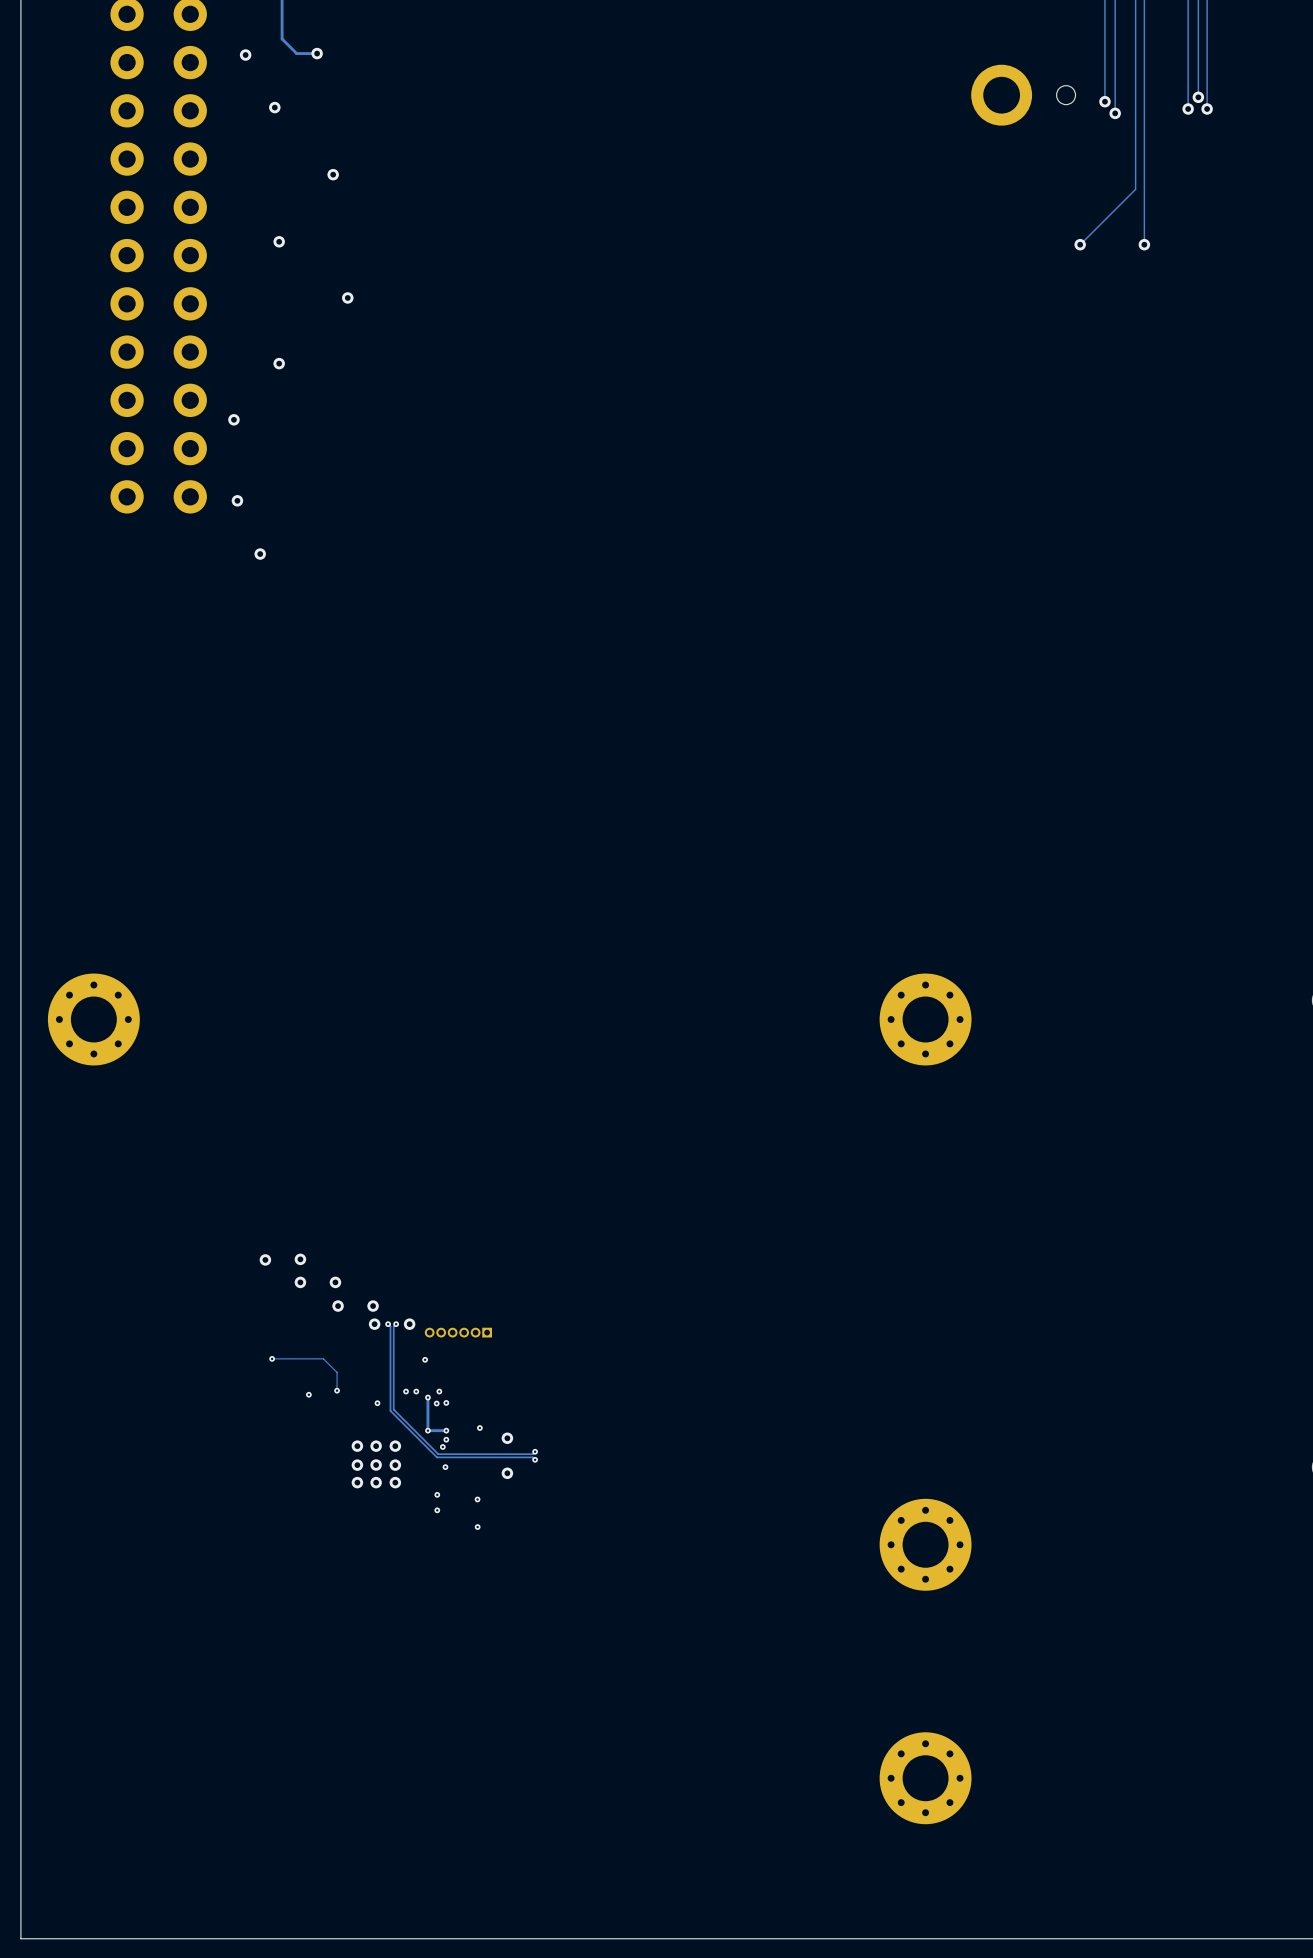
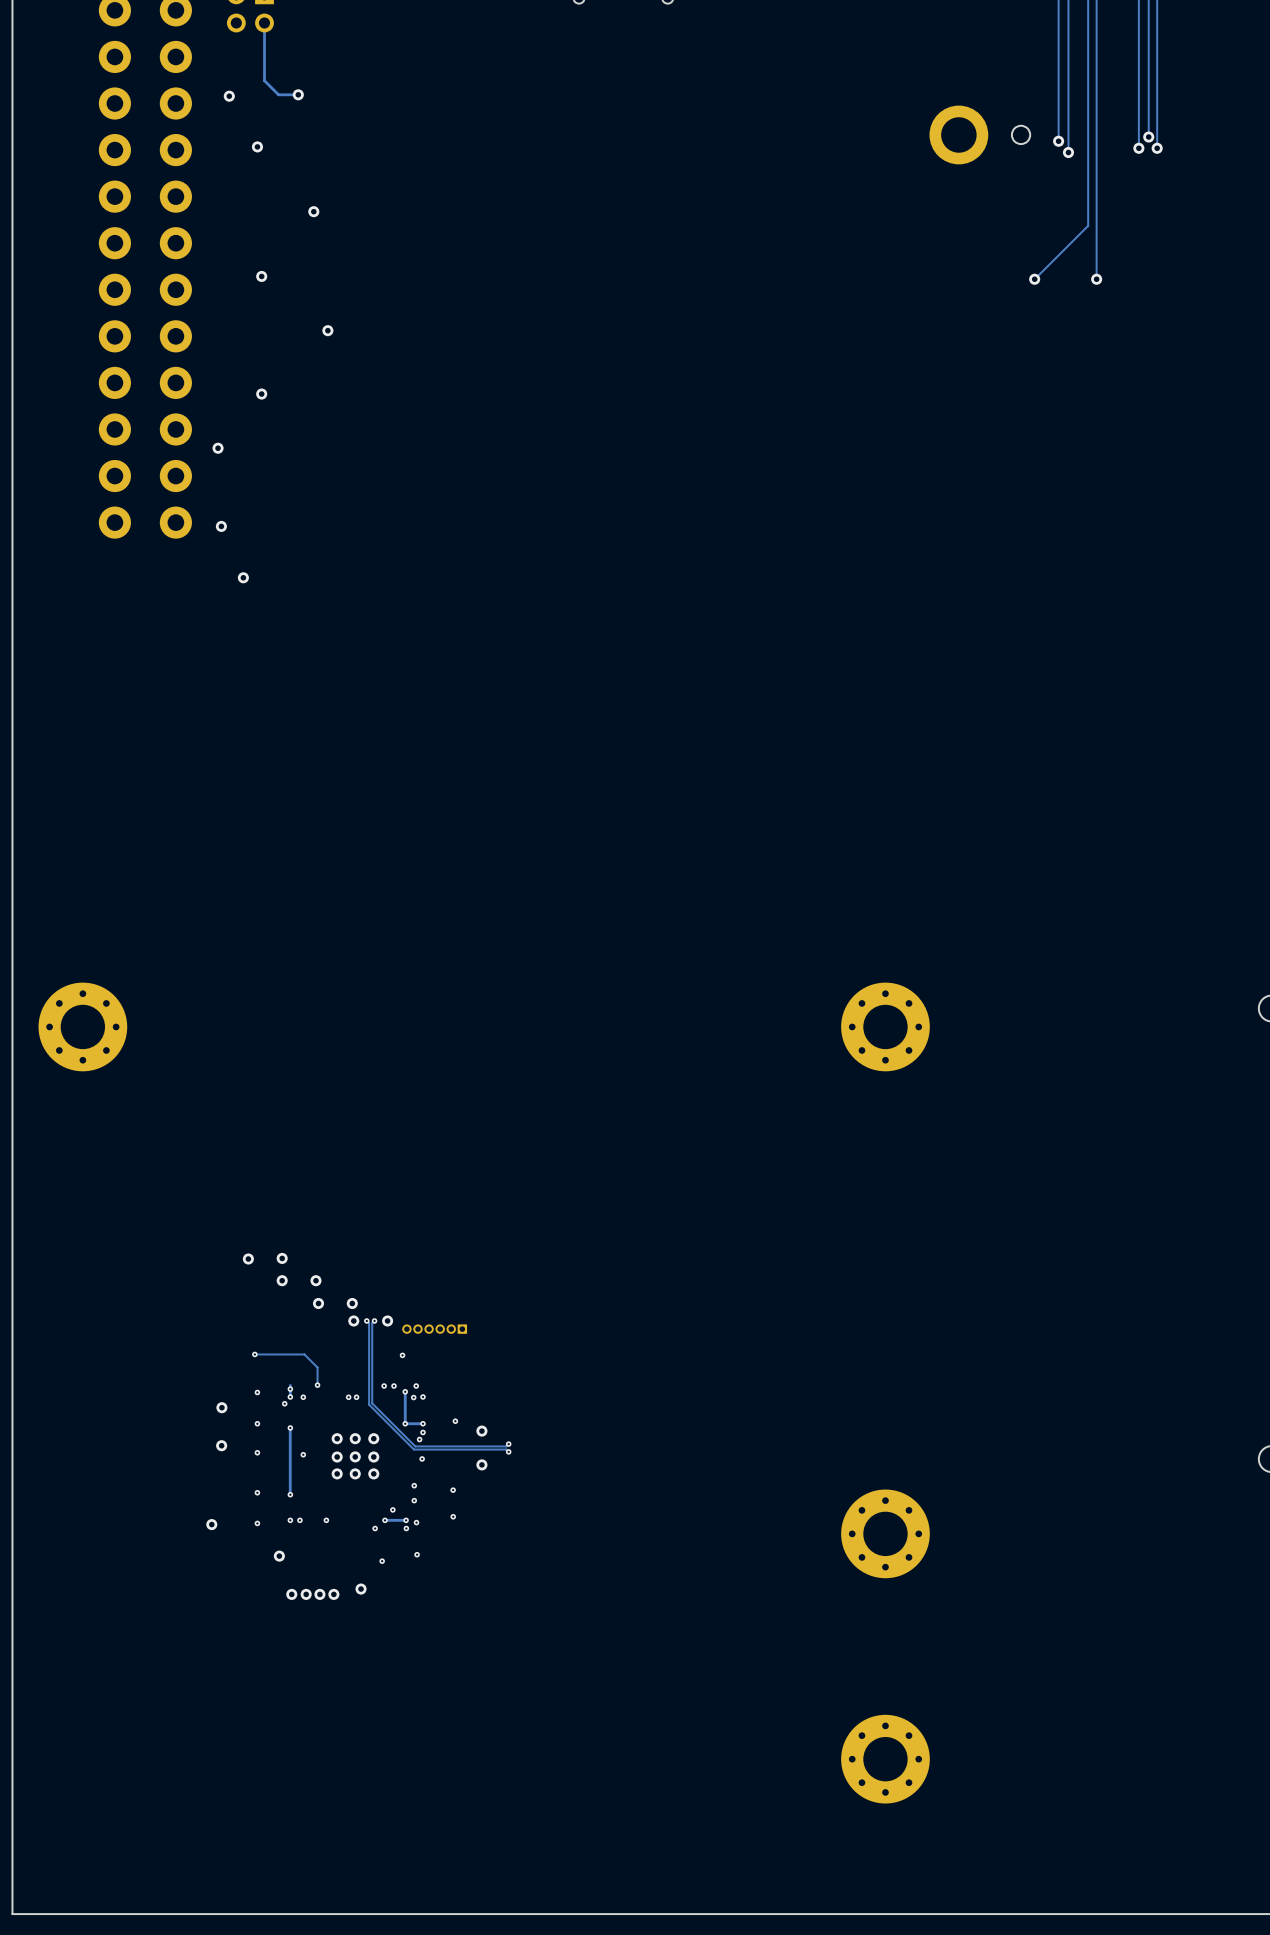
track: none -> (290, 1385) (290, 1396)
via: none -> (257, 1392)
via: none -> (290, 1396)
via: none -> (303, 1397)
via: none -> (348, 1397)
via: none -> (284, 1403)
via: none -> (221, 1407)
via: none -> (257, 1423)
track: none -> (290, 1428) (290, 1494)
via: none -> (290, 1427)
via: none -> (221, 1445)
via: none -> (257, 1452)
via: none -> (303, 1454)
via: none -> (257, 1492)
via: none -> (290, 1494)
via: none -> (392, 1509)
via: none -> (290, 1520)
via: none -> (299, 1520)
via: none -> (326, 1520)
via: none -> (384, 1520)
track: none -> (406, 1520) (384, 1520)
via: none -> (406, 1520)
via: none -> (257, 1523)
via: none -> (416, 1522)
via: none -> (211, 1524)
via: none -> (375, 1528)
via: none -> (406, 1528)
via: none -> (417, 1554)
via: none -> (279, 1556)
via: none -> (382, 1561)
via: none -> (361, 1589)
via: none -> (291, 1594)
via: none -> (306, 1594)
via: none -> (319, 1594)
via: none -> (333, 1594)

